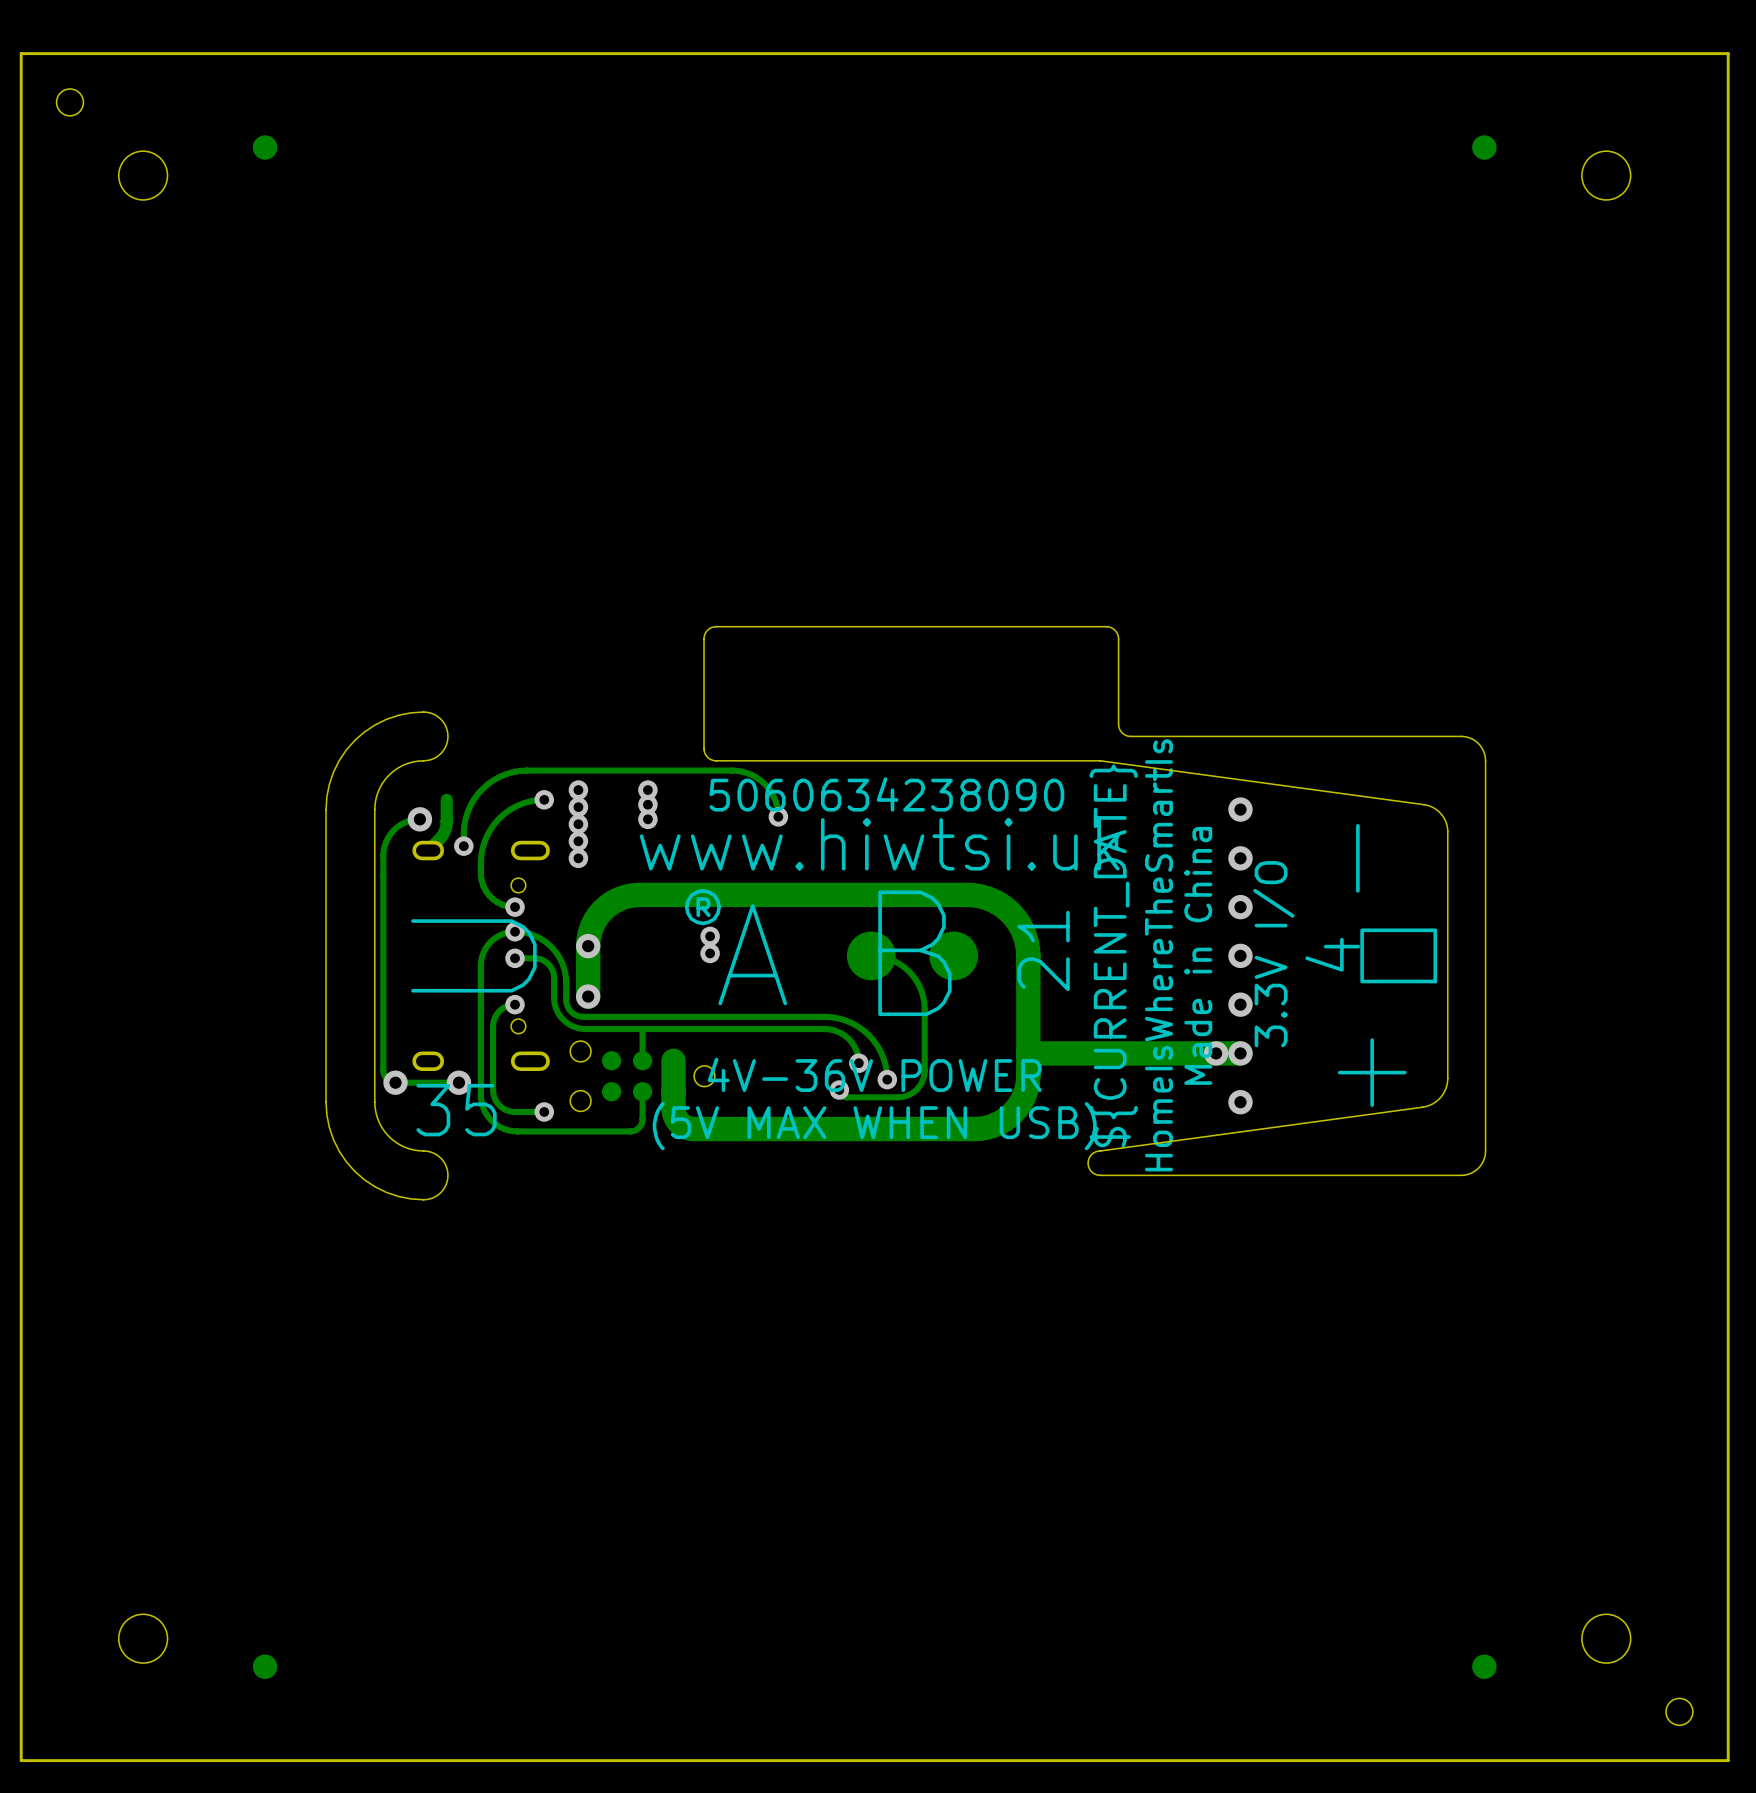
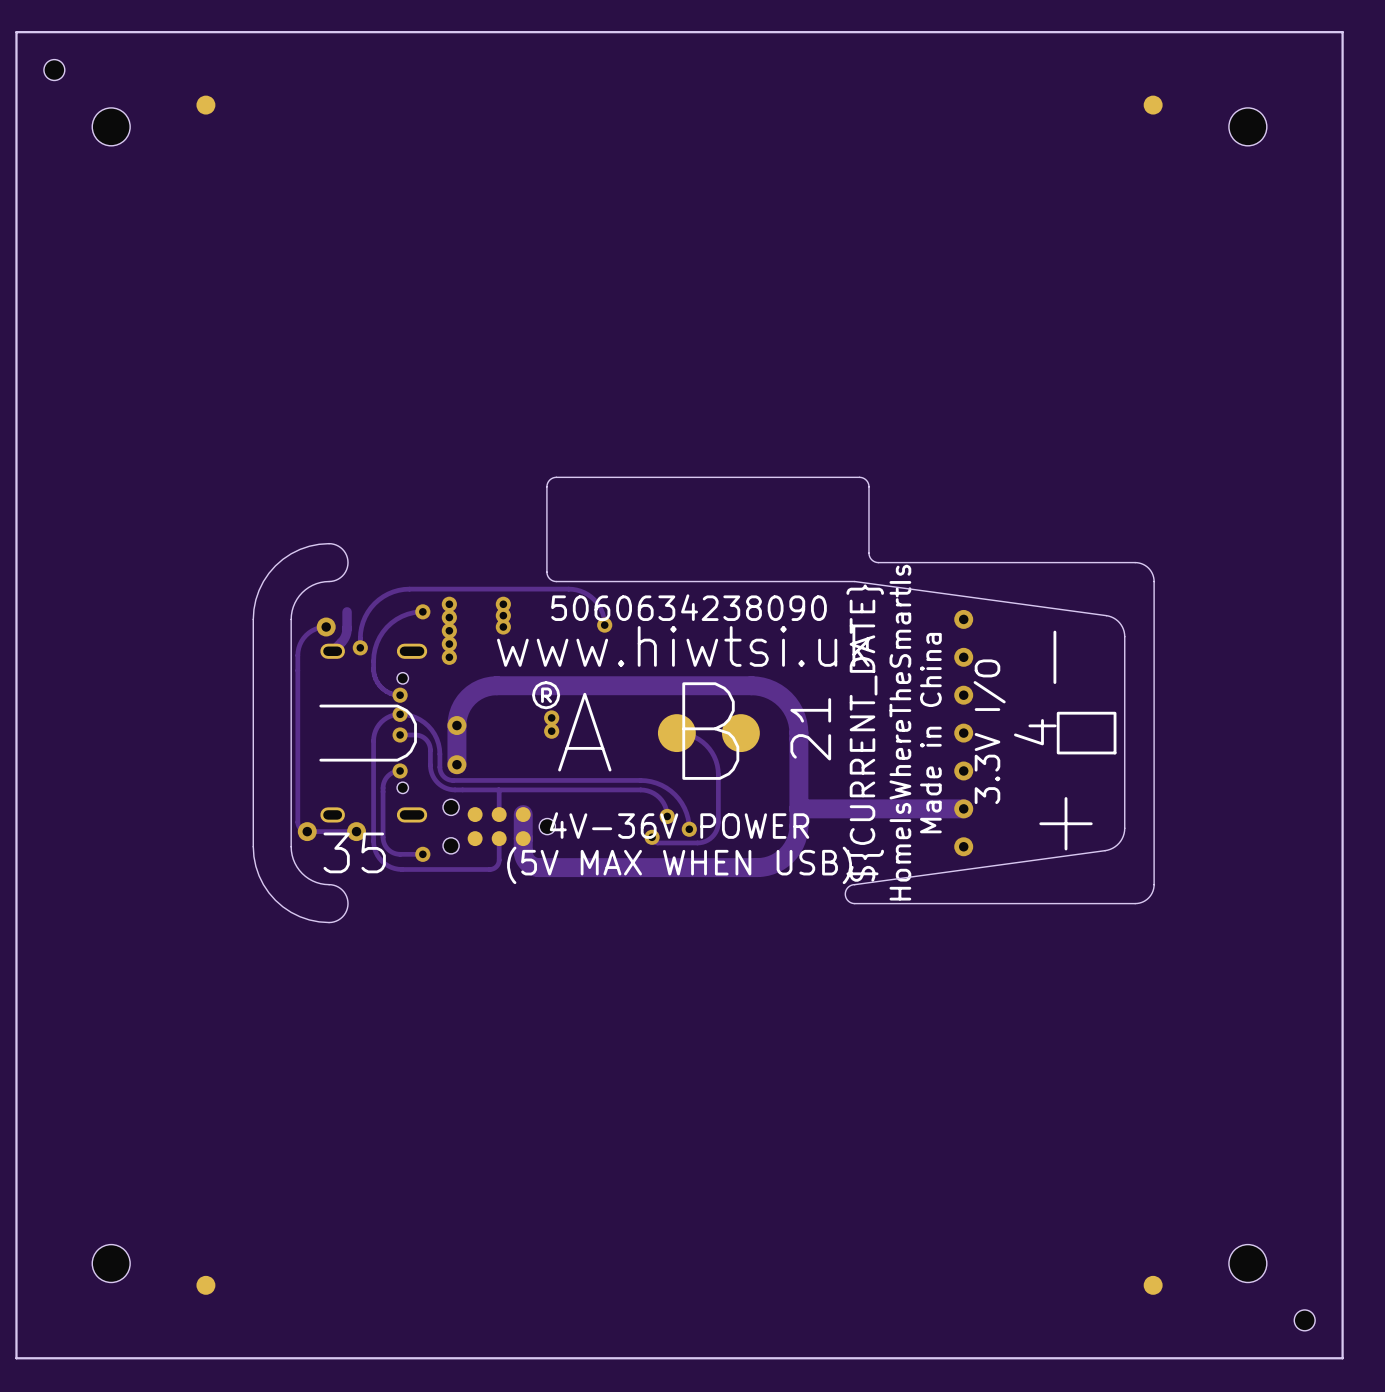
via: (1216, 1053) -> none

